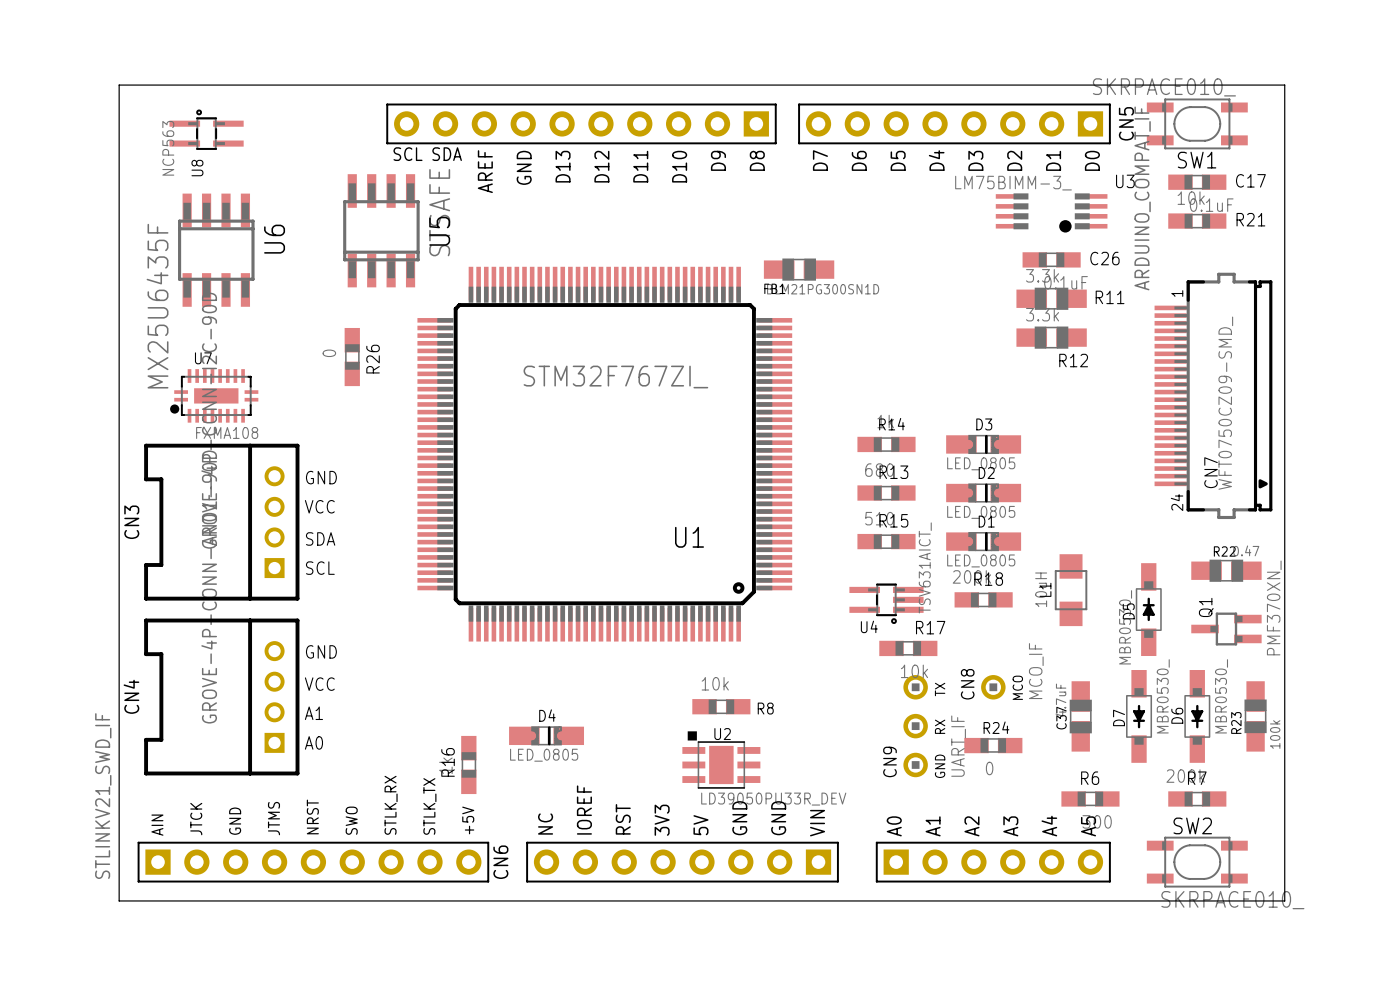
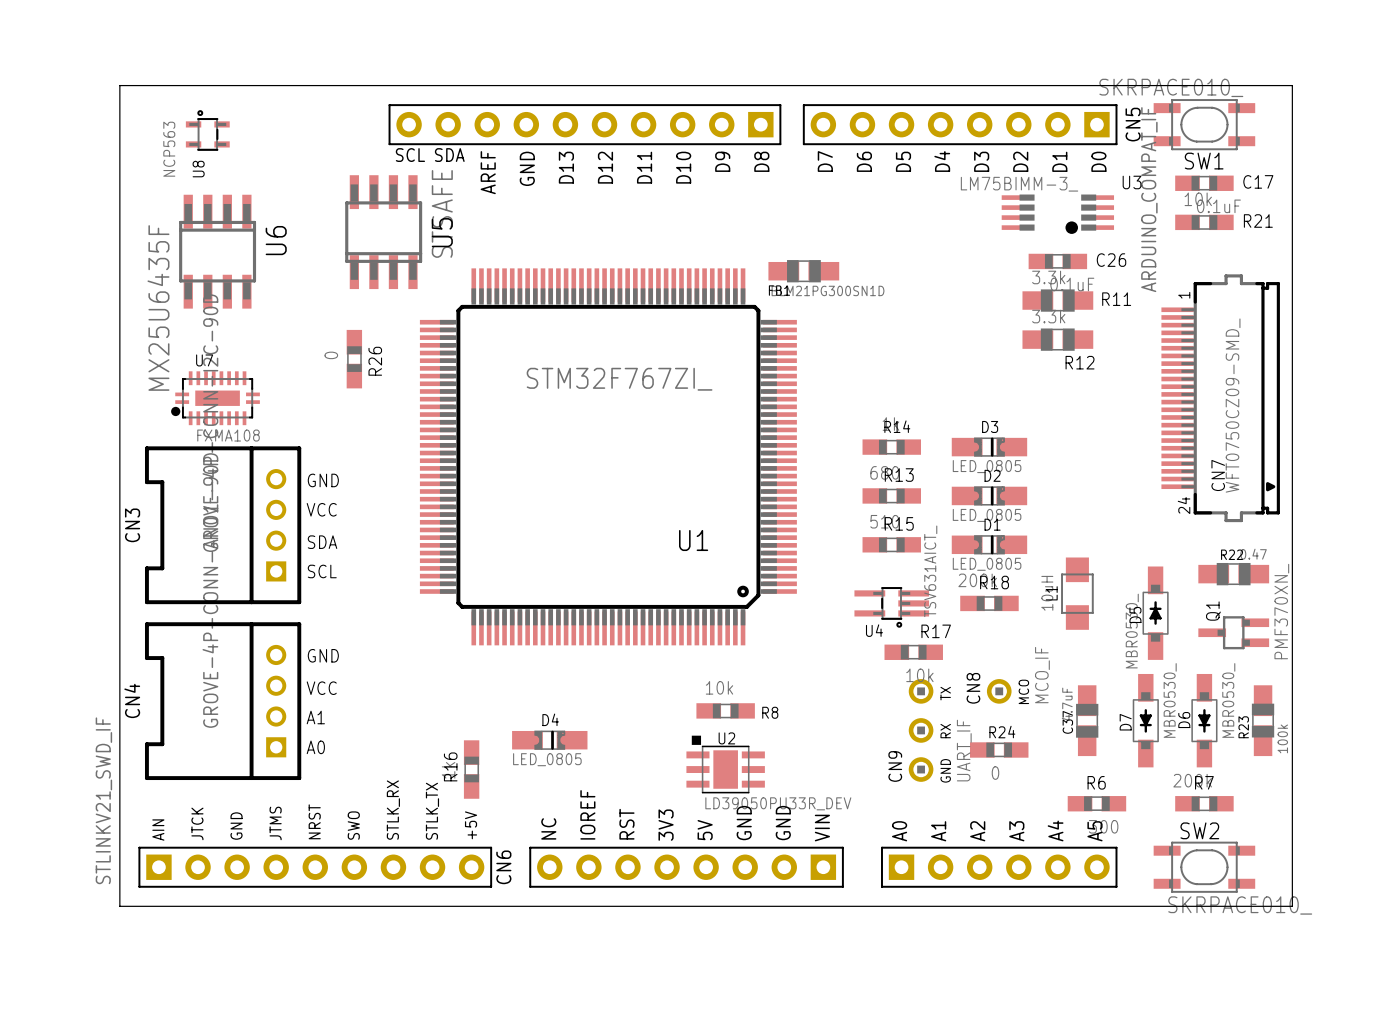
U8 footprint: [169, 109, 244, 150] -> [185, 110, 230, 151]

